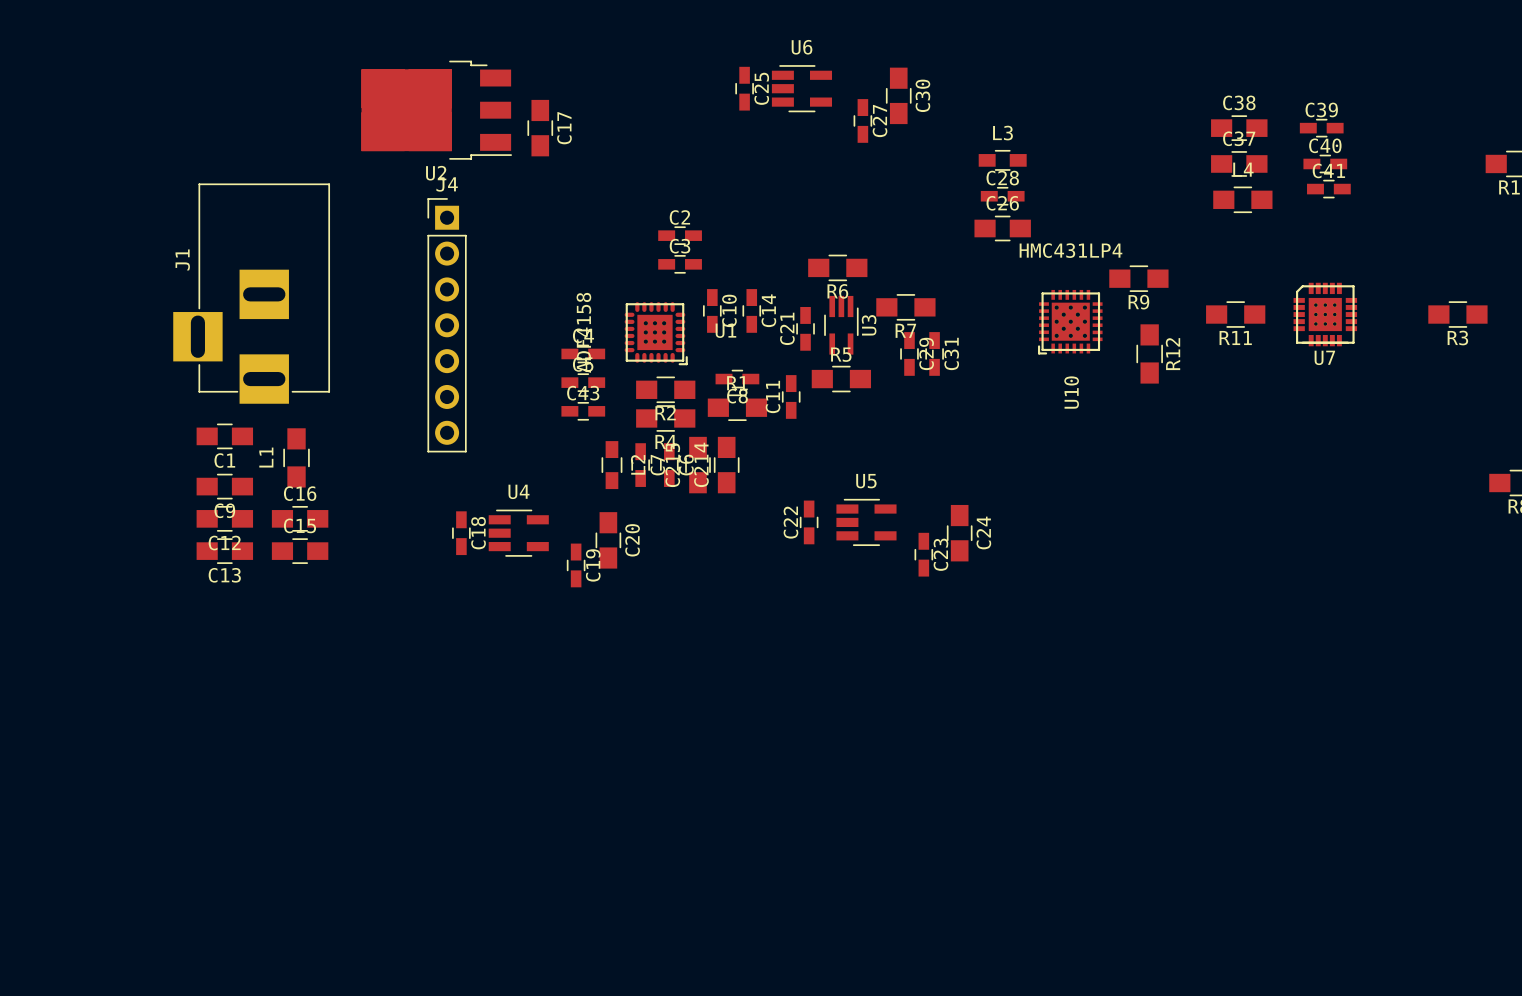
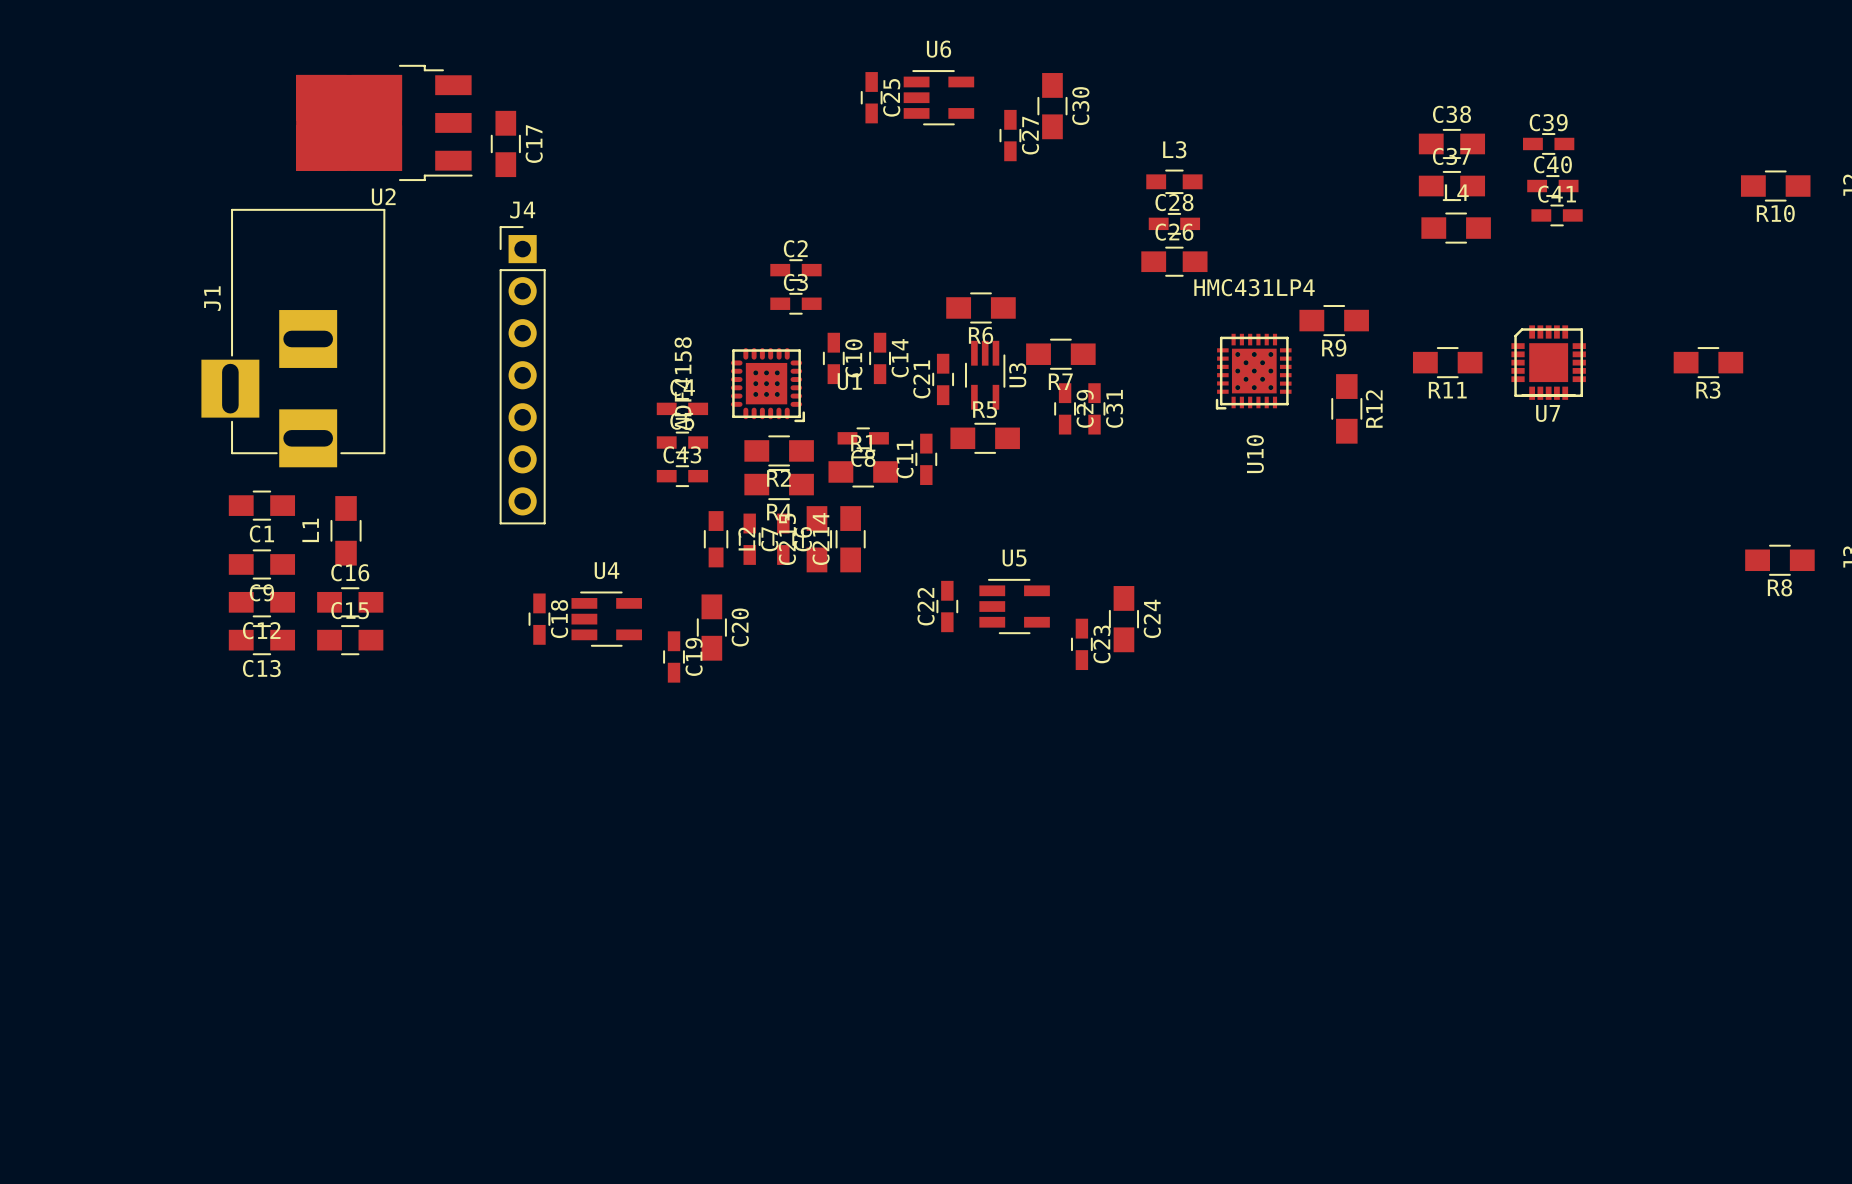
U2 position: (436, 110) -> (384, 122)
C17 position: (540, 128) -> (505, 143)
U7 footprint: [1293, 282, 1358, 347] -> [1511, 325, 1586, 400]

